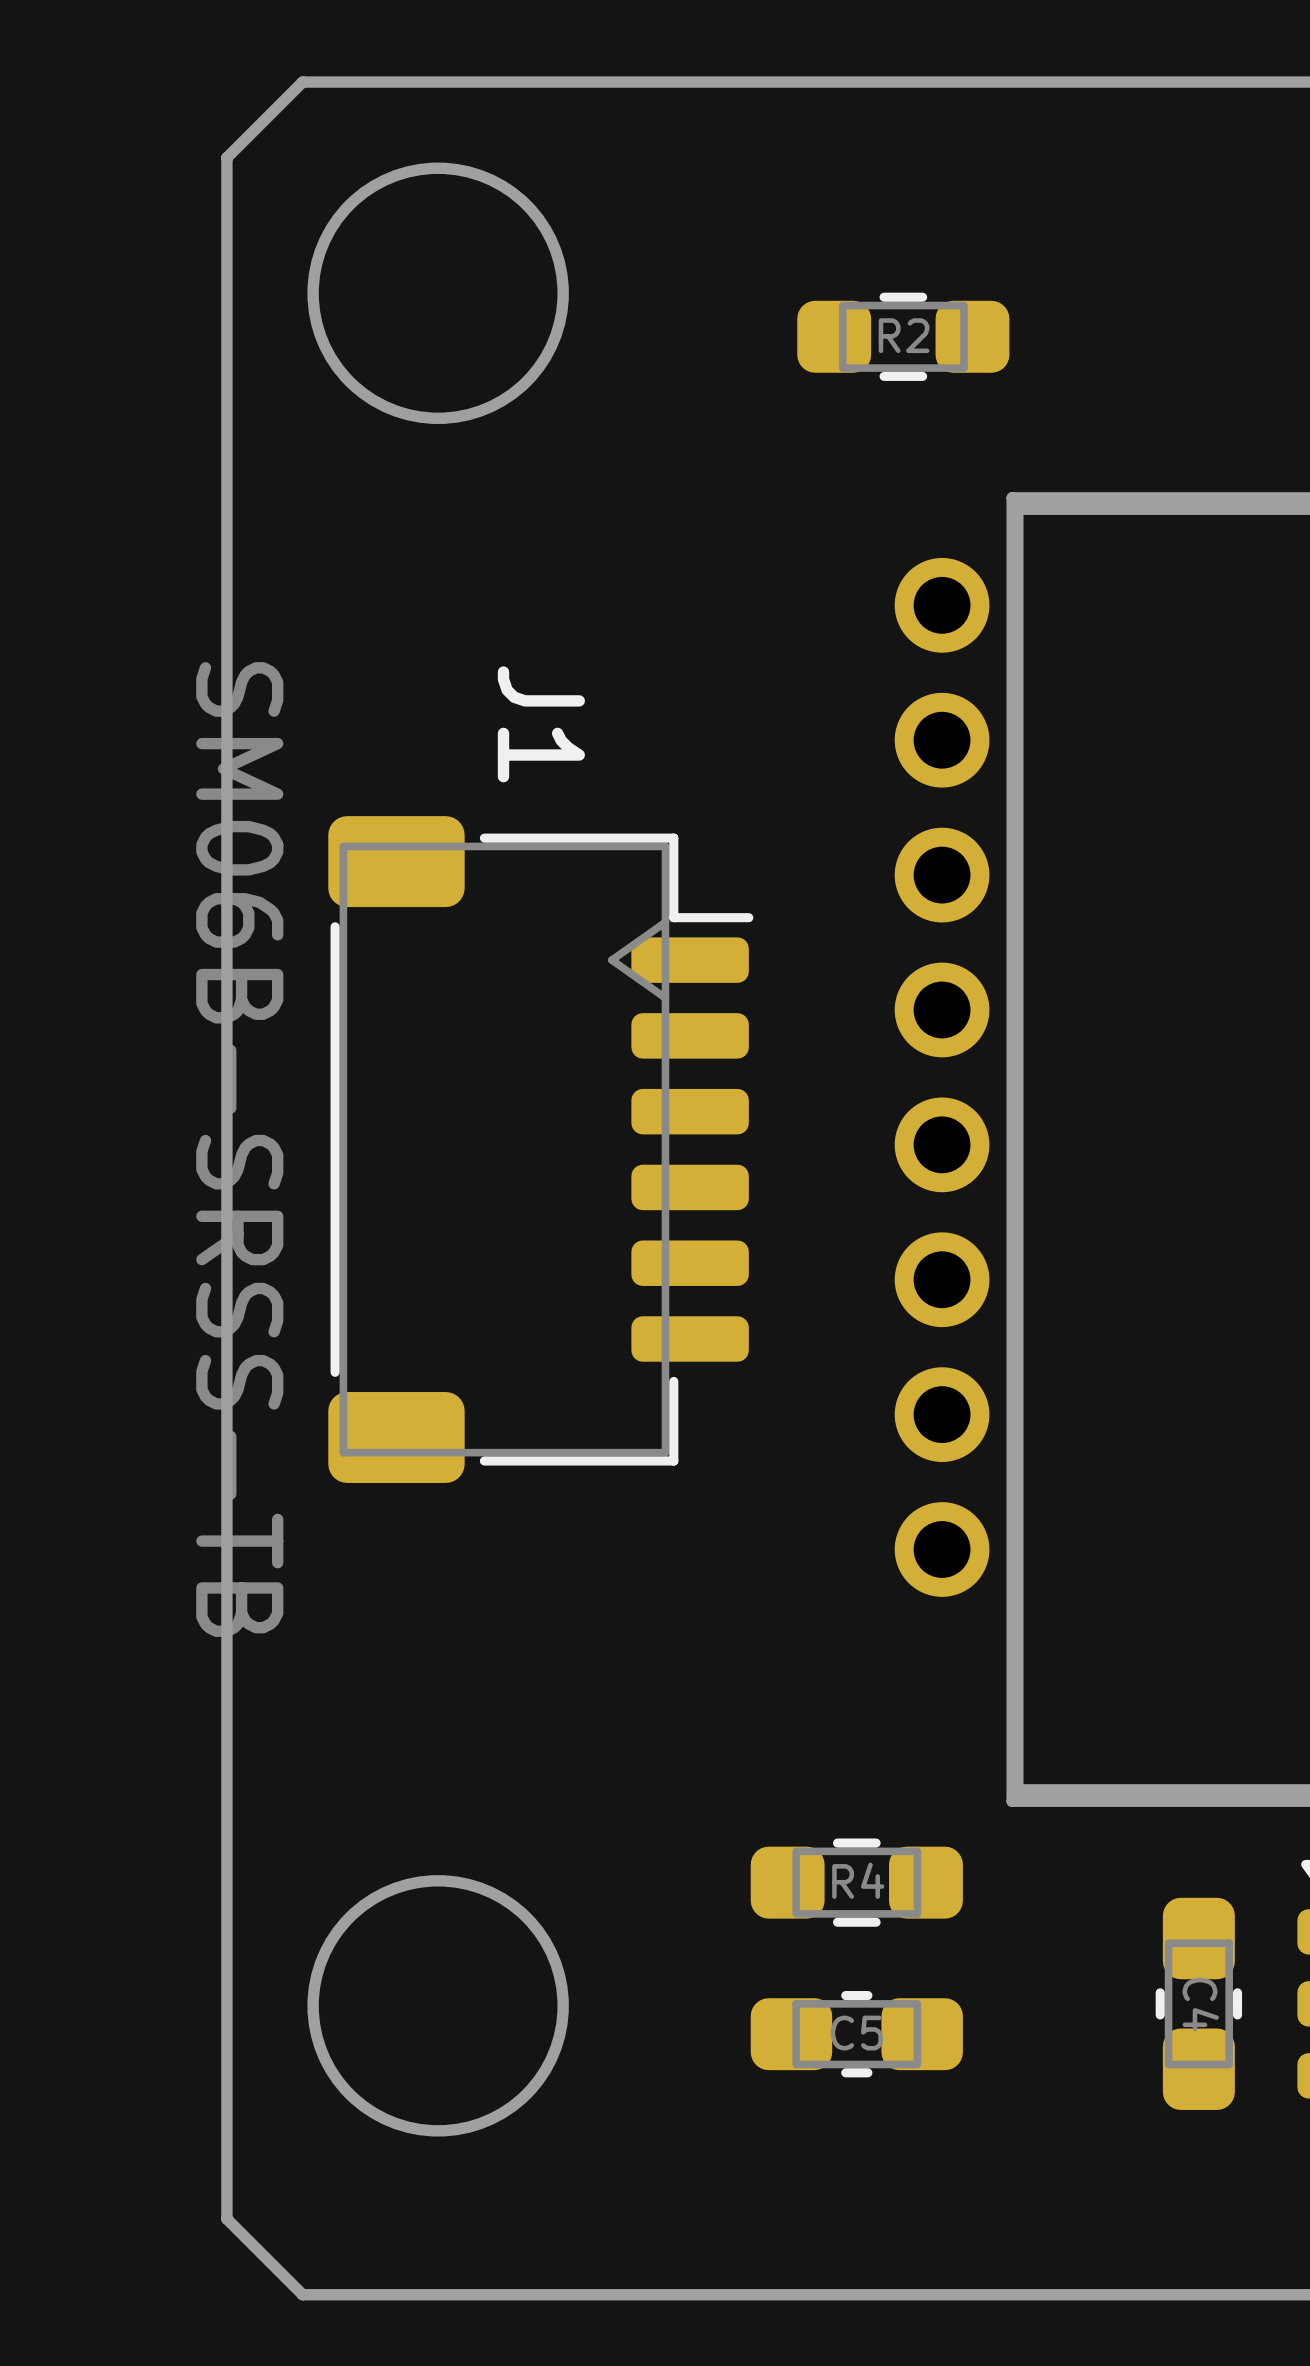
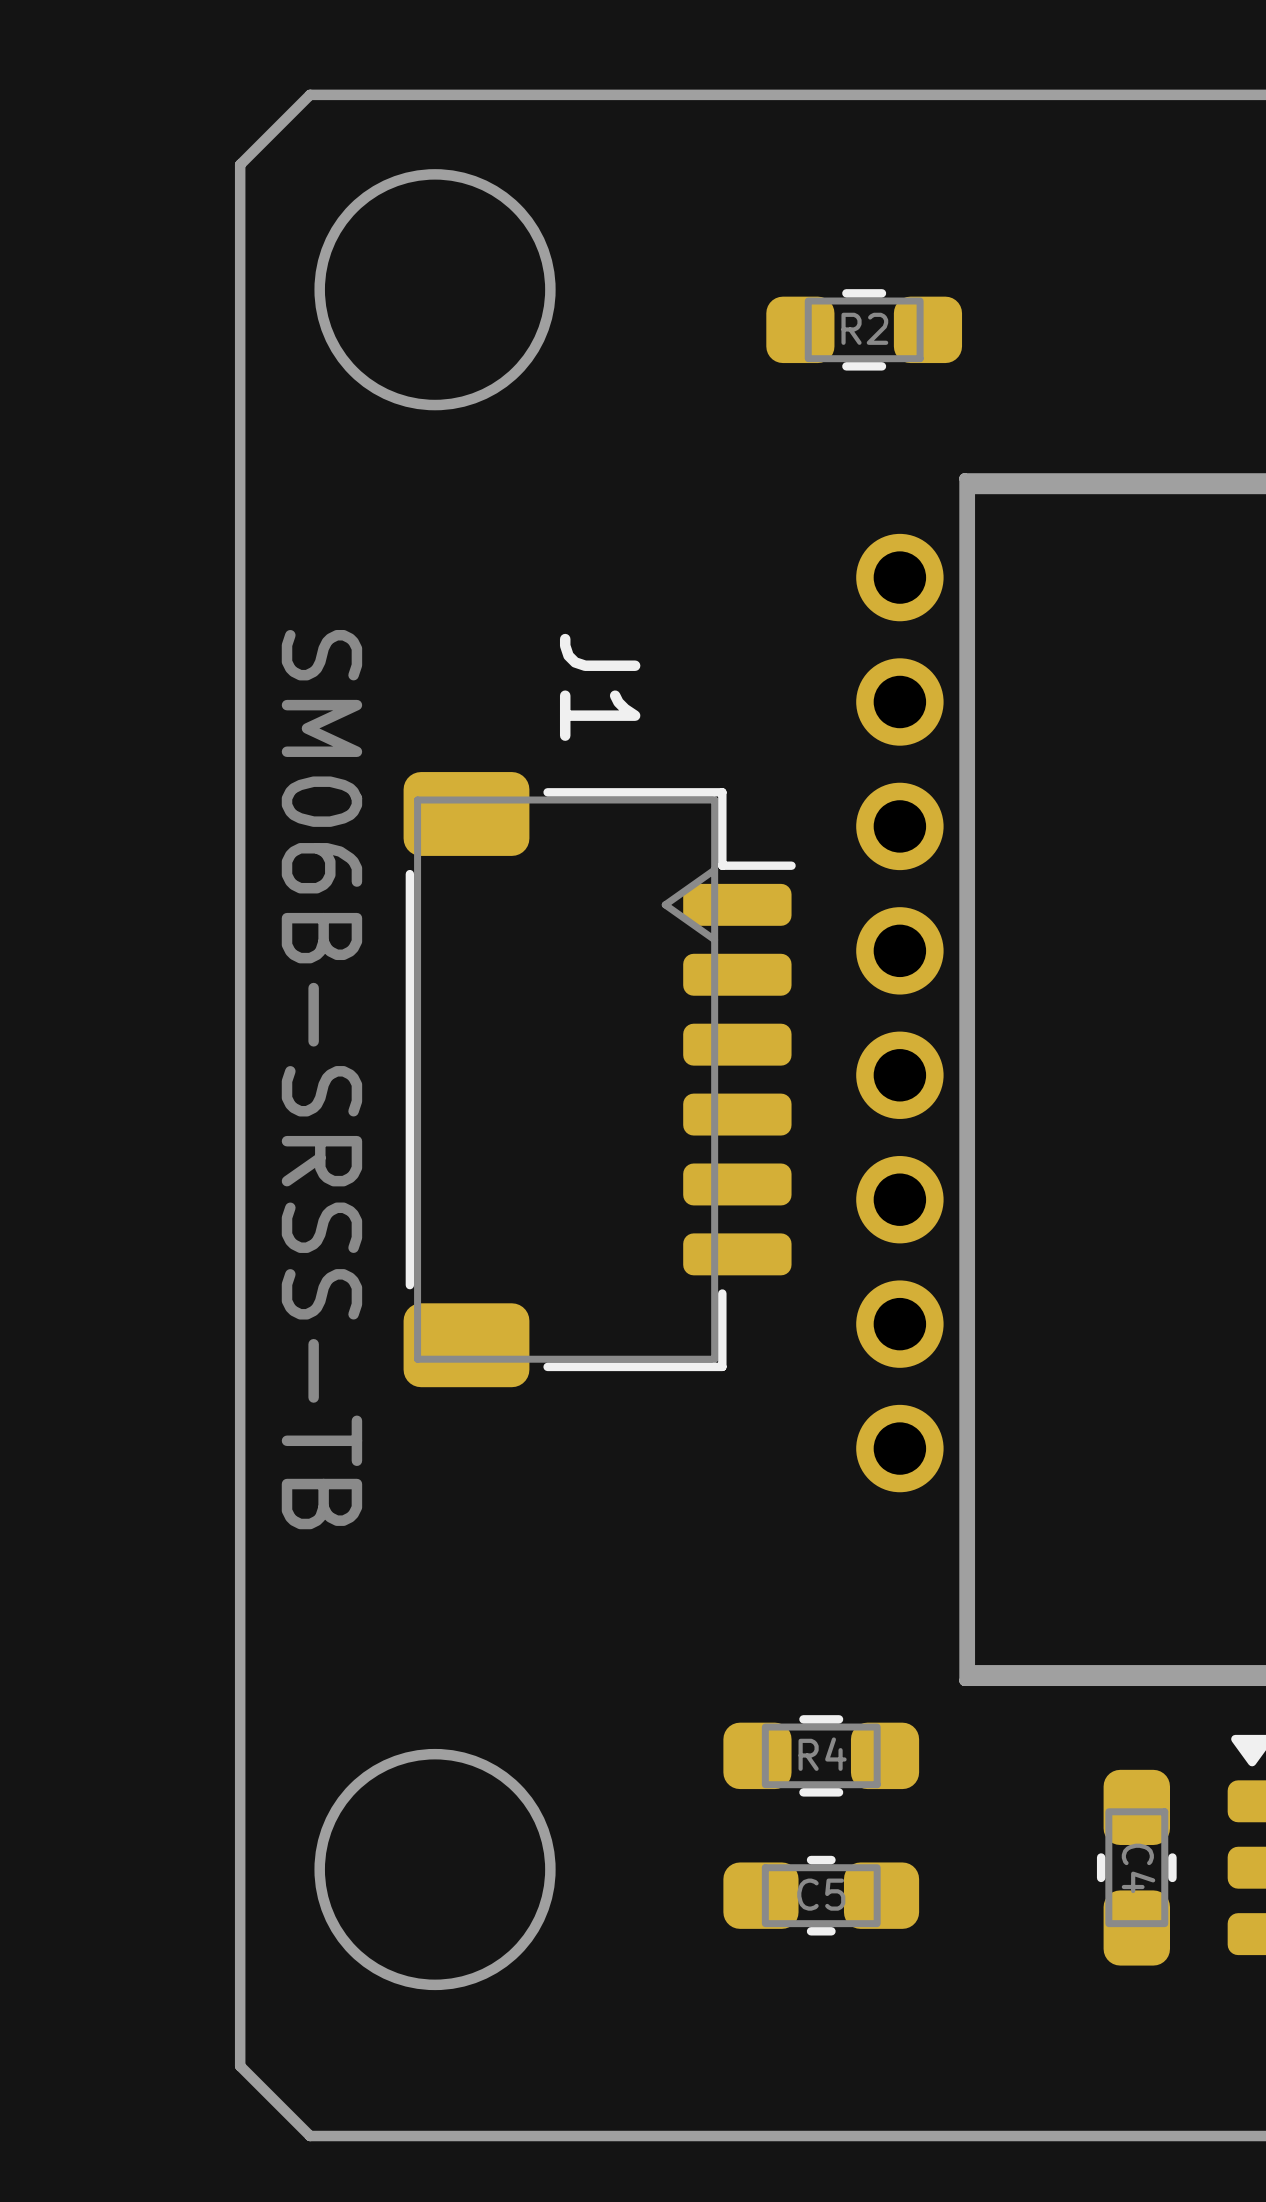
J1 position: (540, 1149) -> (599, 1079)

